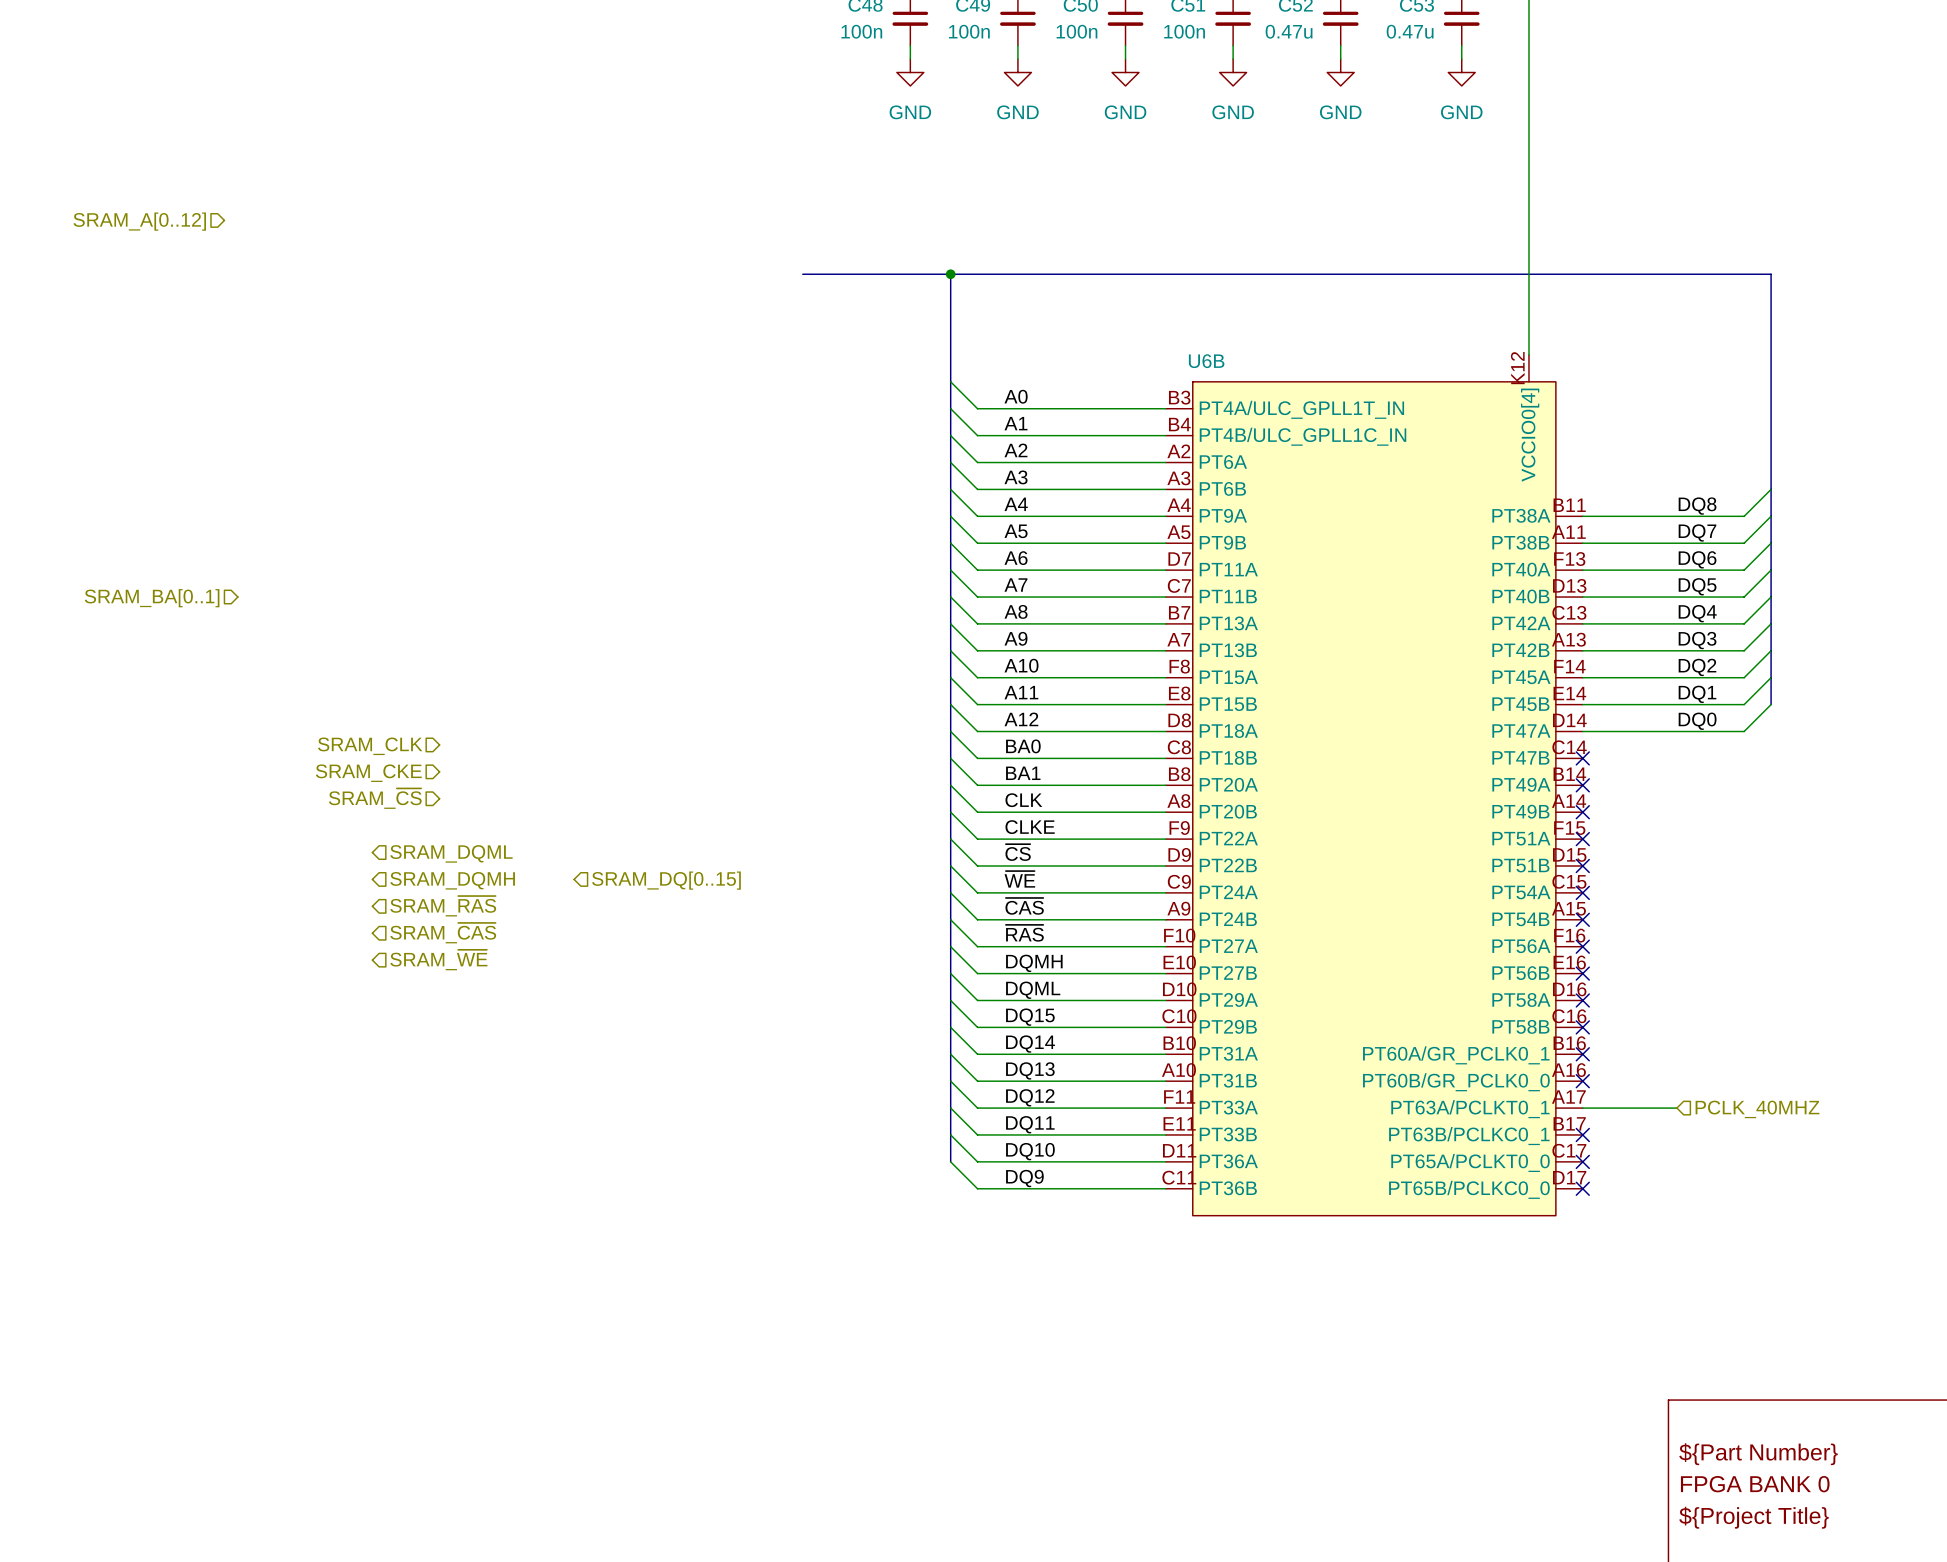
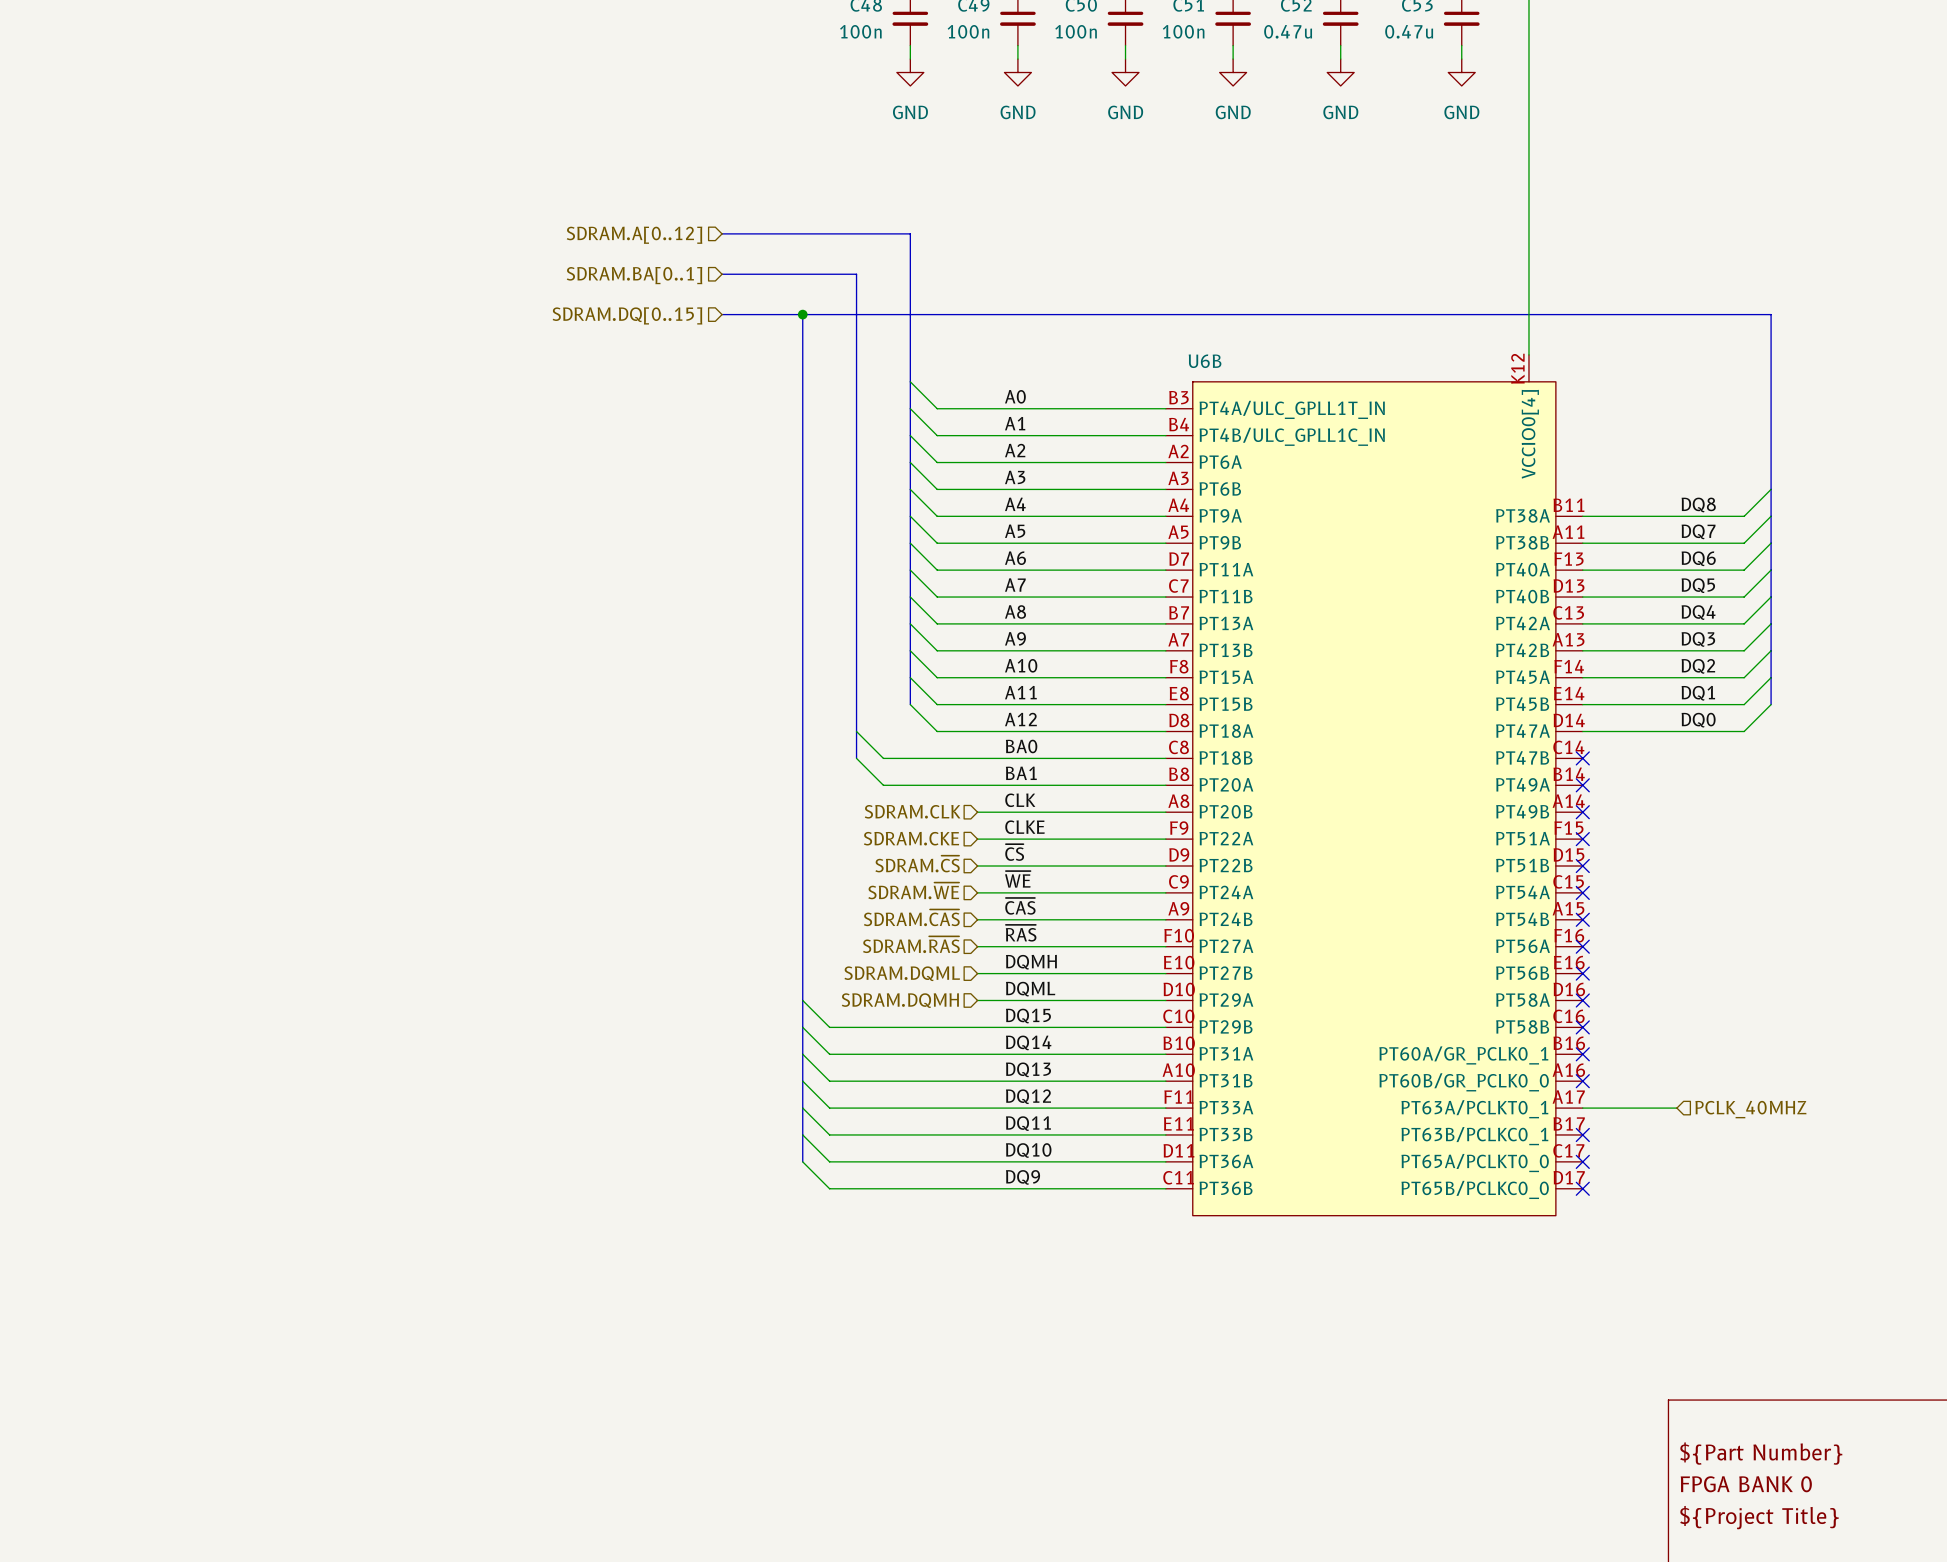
hierarchical label: SRAM_A[0..12] (139, 221) -> none
bus: none -> (722, 233) (910, 233) (910, 704)
hierarchical label: none -> SDRAM.A[0..12] (634, 235)
bus: none -> (722, 274) (802, 274)
bus: (856, 274) (1771, 274) (1771, 314) -> (722, 314) (1771, 314)
bus: none -> (856, 274) (856, 758)
bus: (950, 274) (950, 1161) -> none
junction: (950, 274) -> none
hierarchical label: none -> SDRAM.BA[0..1] (634, 275)
bus: none -> (802, 314) (802, 1161)
junction: none -> (802, 314)
hierarchical label: none -> SDRAM.DQ[0..15] (627, 315)
wire: (950, 381) (977, 408) -> (910, 381) (937, 408) (977, 408)
wire: (950, 408) (977, 435) -> (910, 408) (937, 435) (977, 435)
wire: (950, 435) (977, 462) -> (910, 435) (937, 462) (977, 462)
wire: (950, 462) (977, 489) -> (910, 462) (937, 489) (977, 489)
wire: (950, 489) (977, 516) -> (910, 489) (937, 516) (977, 516)
wire: (950, 516) (977, 543) -> (910, 516) (937, 543) (977, 543)
wire: (950, 543) (977, 570) -> (910, 543) (937, 570) (977, 570)
wire: (950, 570) (977, 597) -> (910, 570) (937, 597) (977, 597)
wire: (950, 597) (977, 623) -> (910, 597) (937, 623) (977, 623)
hierarchical label: SRAM_BA[0..1] (152, 598) -> none
wire: (950, 623) (977, 650) -> (910, 623) (937, 650) (977, 650)
wire: (950, 650) (977, 677) -> (910, 650) (937, 677) (977, 677)
wire: (950, 677) (977, 704) -> (910, 677) (937, 704) (977, 704)
wire: (950, 704) (977, 731) -> (910, 704) (937, 731) (977, 731)
wire: (950, 731) (977, 758) -> (856, 731) (883, 758) (977, 758)
hierarchical label: SRAM_CLK (370, 746) -> none
wire: (950, 758) (977, 785) -> (856, 758) (883, 785) (977, 785)
hierarchical label: SRAM_CKE (368, 773) -> none
wire: (950, 785) (977, 812) -> none
hierarchical label: SRAM_~{CS} (375, 798) -> none
hierarchical label: none -> SDRAM.CLK (912, 811)
wire: (950, 812) (977, 839) -> none
hierarchical label: none -> SDRAM.CKE (911, 838)
wire: (950, 839) (977, 866) -> none
hierarchical label: SRAM_DQML (451, 853) -> none
hierarchical label: none -> SDRAM.~{CS} (917, 864)
wire: (950, 866) (977, 892) -> none
hierarchical label: SRAM_DQMH (452, 880) -> none
hierarchical label: SRAM_DQ[0..15] (666, 880) -> none
hierarchical label: none -> SDRAM.~{WE} (913, 890)
wire: (950, 892) (977, 919) -> none
hierarchical label: SRAM_~{RAS} (443, 906) -> none
hierarchical label: none -> SDRAM.~{CAS} (911, 917)
wire: (950, 919) (977, 946) -> none
hierarchical label: SRAM_~{CAS} (443, 933) -> none
hierarchical label: none -> SDRAM.~{RAS} (911, 944)
wire: (950, 946) (977, 973) -> none
hierarchical label: SRAM_~{WE} (438, 960) -> none
wire: (950, 973) (977, 1000) -> none
hierarchical label: none -> SDRAM.DQML (902, 973)
wire: (950, 1000) (977, 1027) -> (802, 1000) (829, 1027) (977, 1027)
hierarchical label: none -> SDRAM.DQMH (900, 1000)
wire: (950, 1027) (977, 1054) -> (802, 1027) (829, 1054) (977, 1054)
wire: (950, 1054) (977, 1081) -> (802, 1054) (829, 1081) (977, 1081)
wire: (950, 1081) (977, 1108) -> (802, 1081) (829, 1108) (977, 1108)
wire: (950, 1108) (977, 1134) -> (802, 1108) (829, 1134) (977, 1134)
wire: (950, 1134) (977, 1161) -> (802, 1134) (829, 1161) (977, 1161)
wire: (950, 1161) (977, 1188) -> (802, 1161) (829, 1188) (977, 1188)

